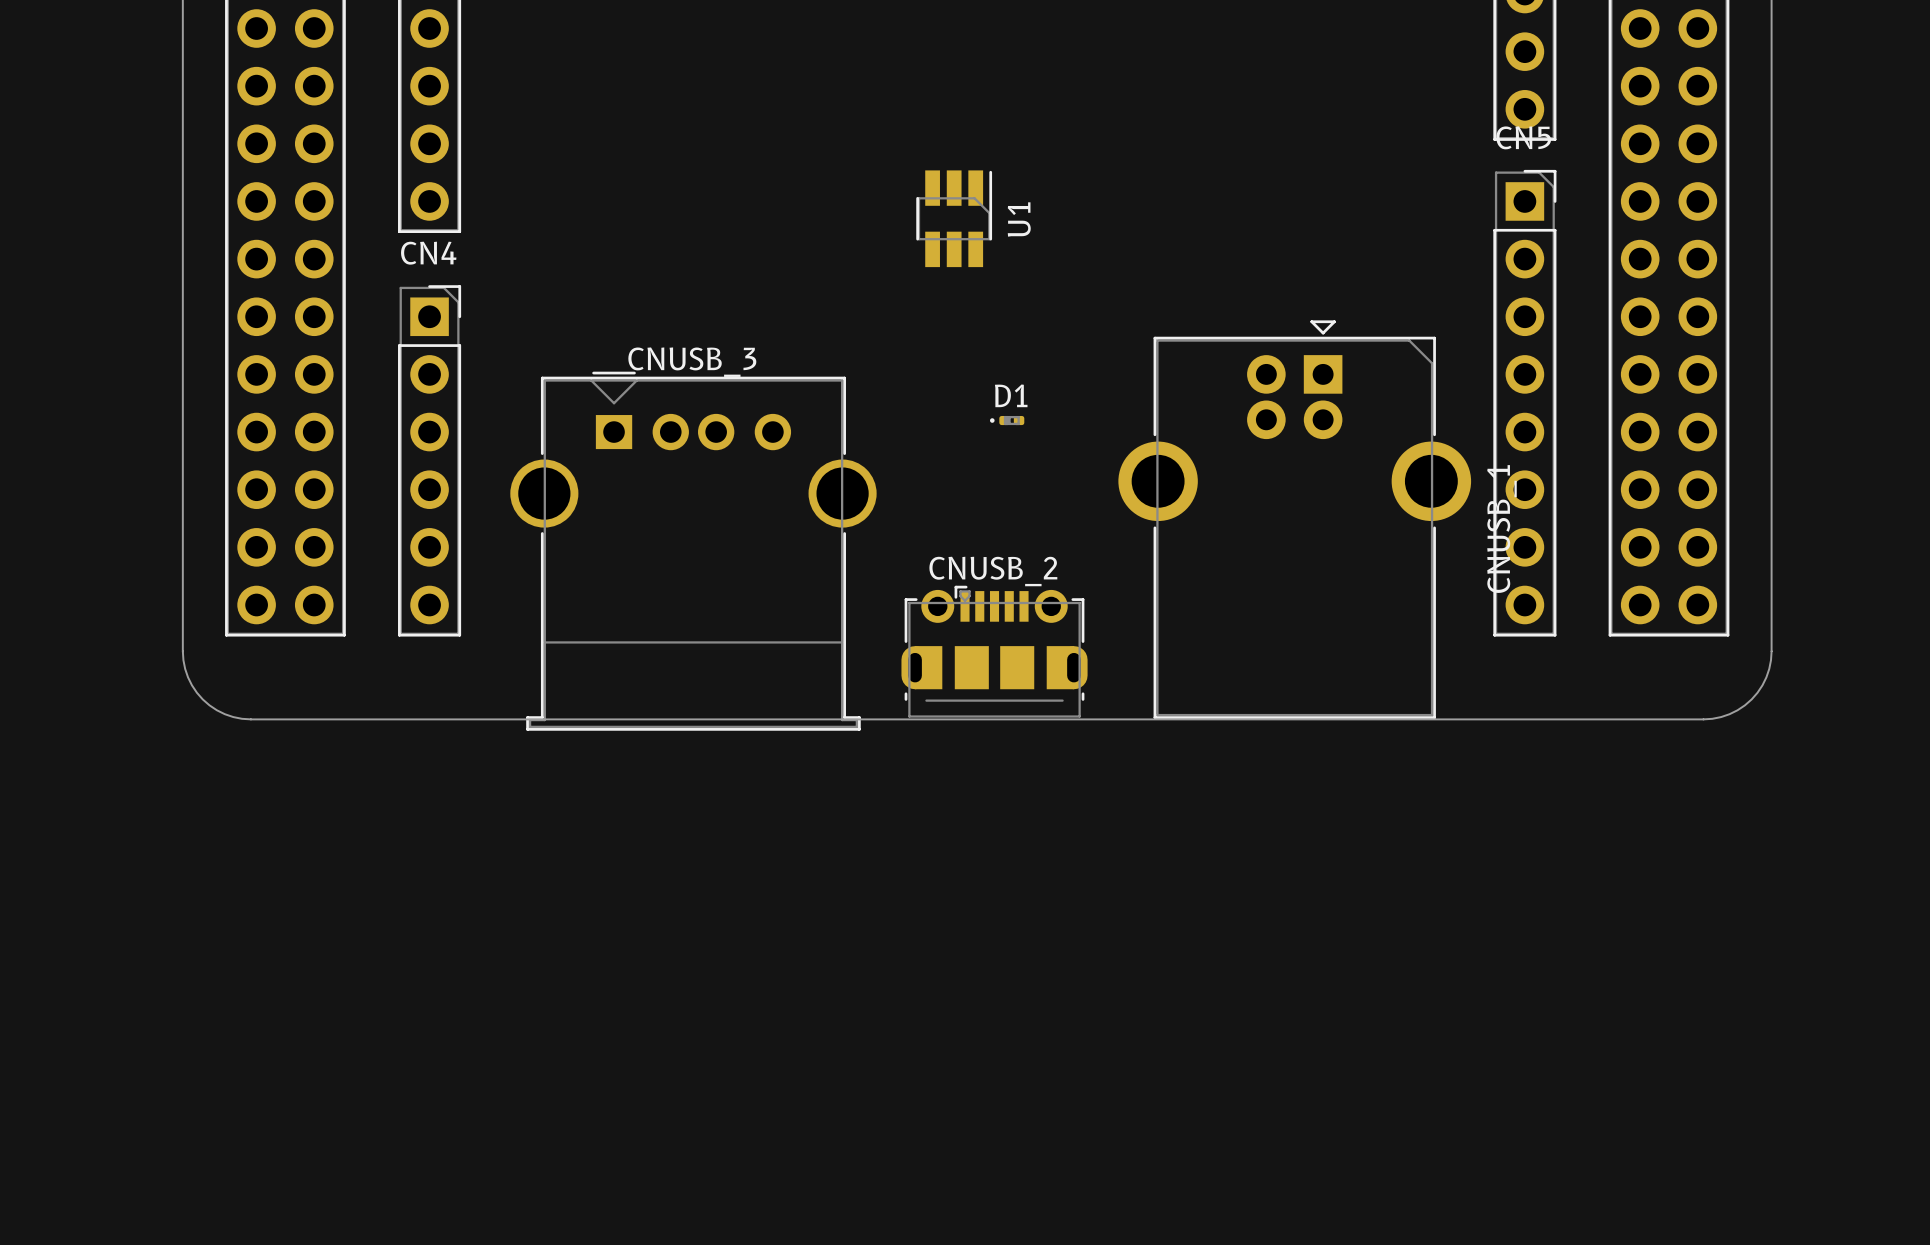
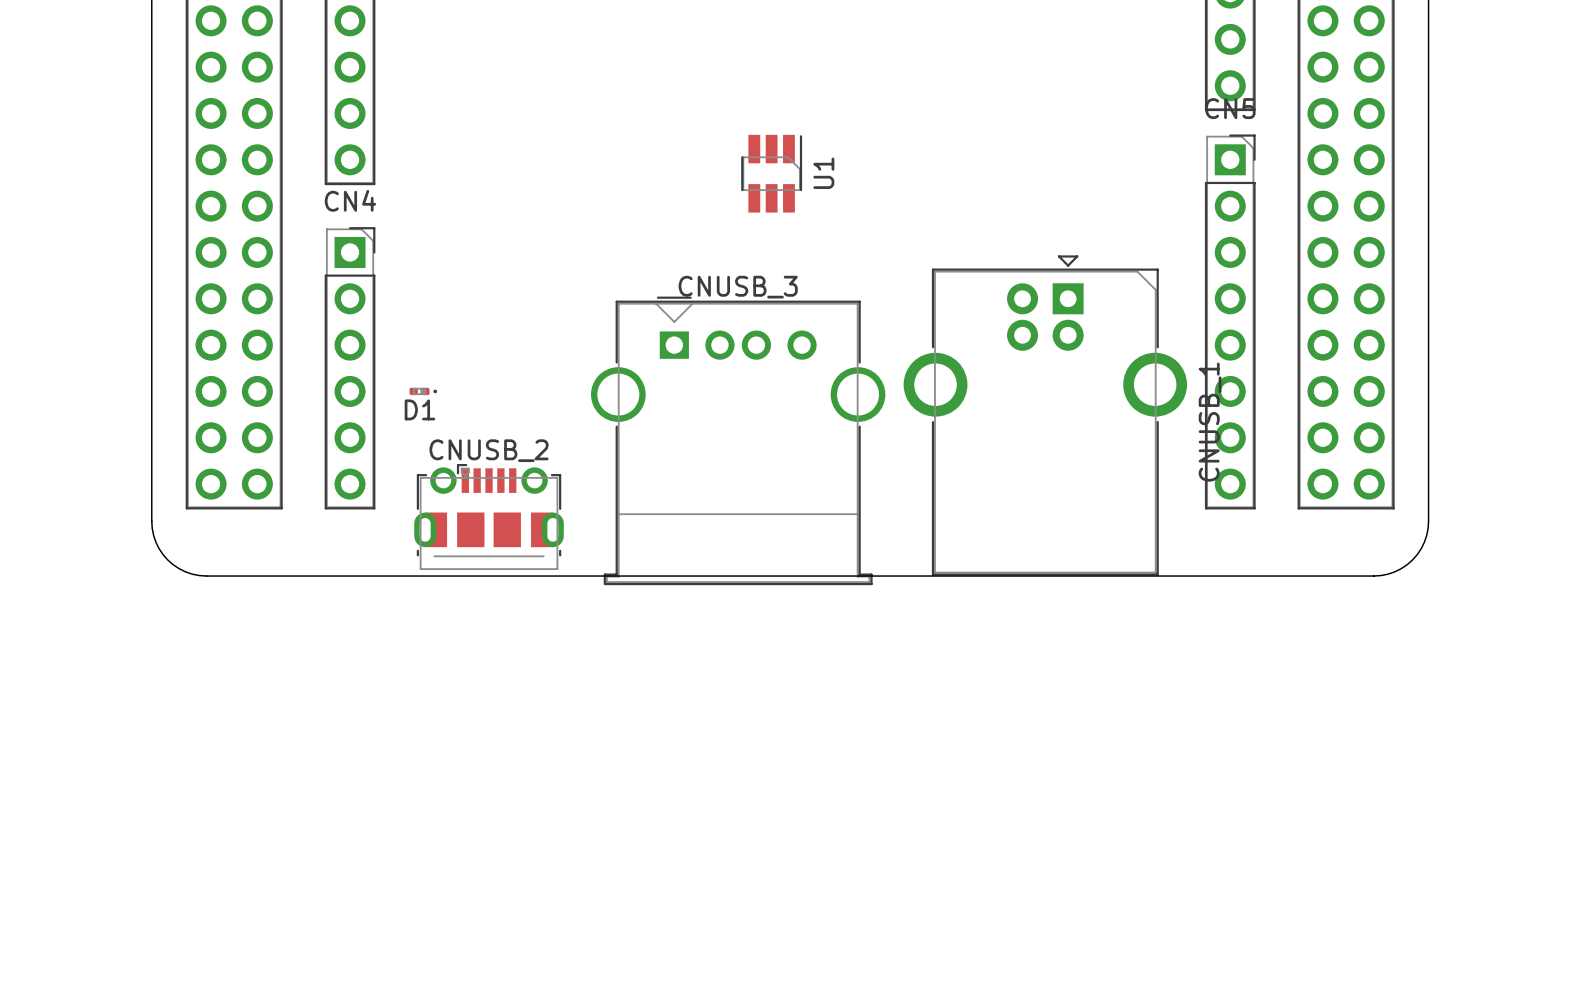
D1 rotation: 0° (1007, 420) -> 180° (423, 391)
D1 position: (1007, 420) -> (423, 391)
CNUSB_3 position: (693, 551) -> (738, 440)
CNUSB_2 position: (994, 651) -> (489, 517)

